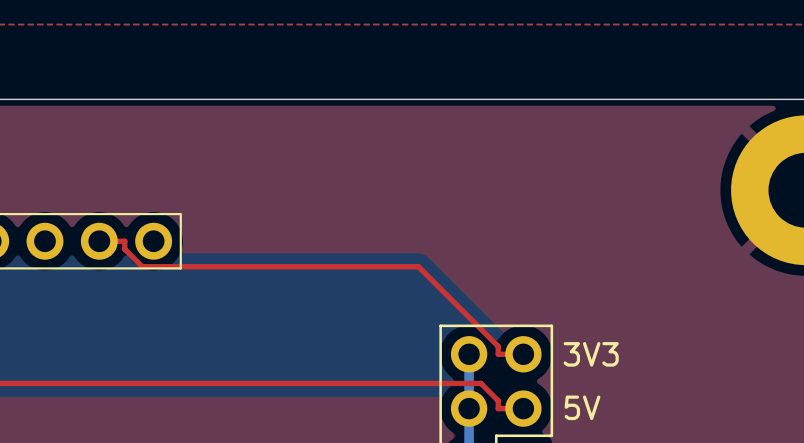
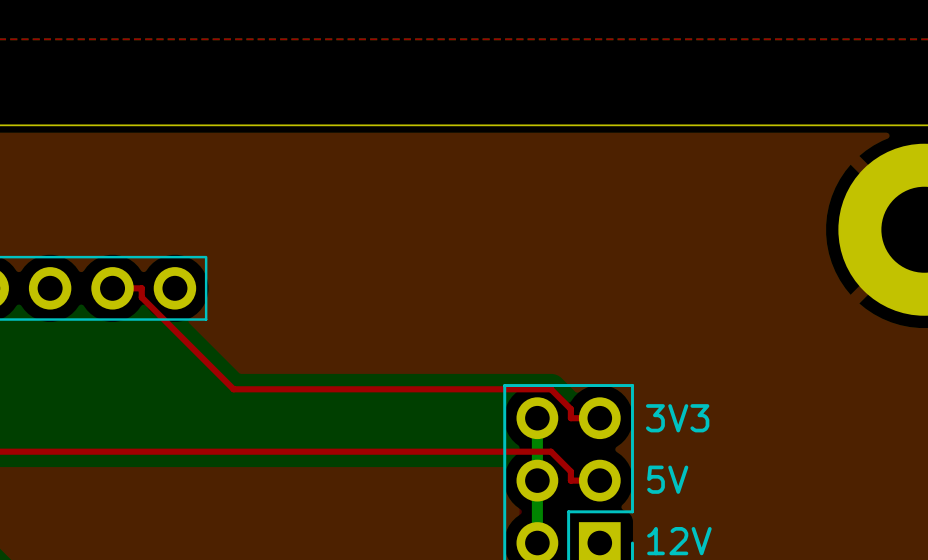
top track: (142, 266) (418, 266) (480, 329) -> (161, 317) (233, 389) (551, 389)

